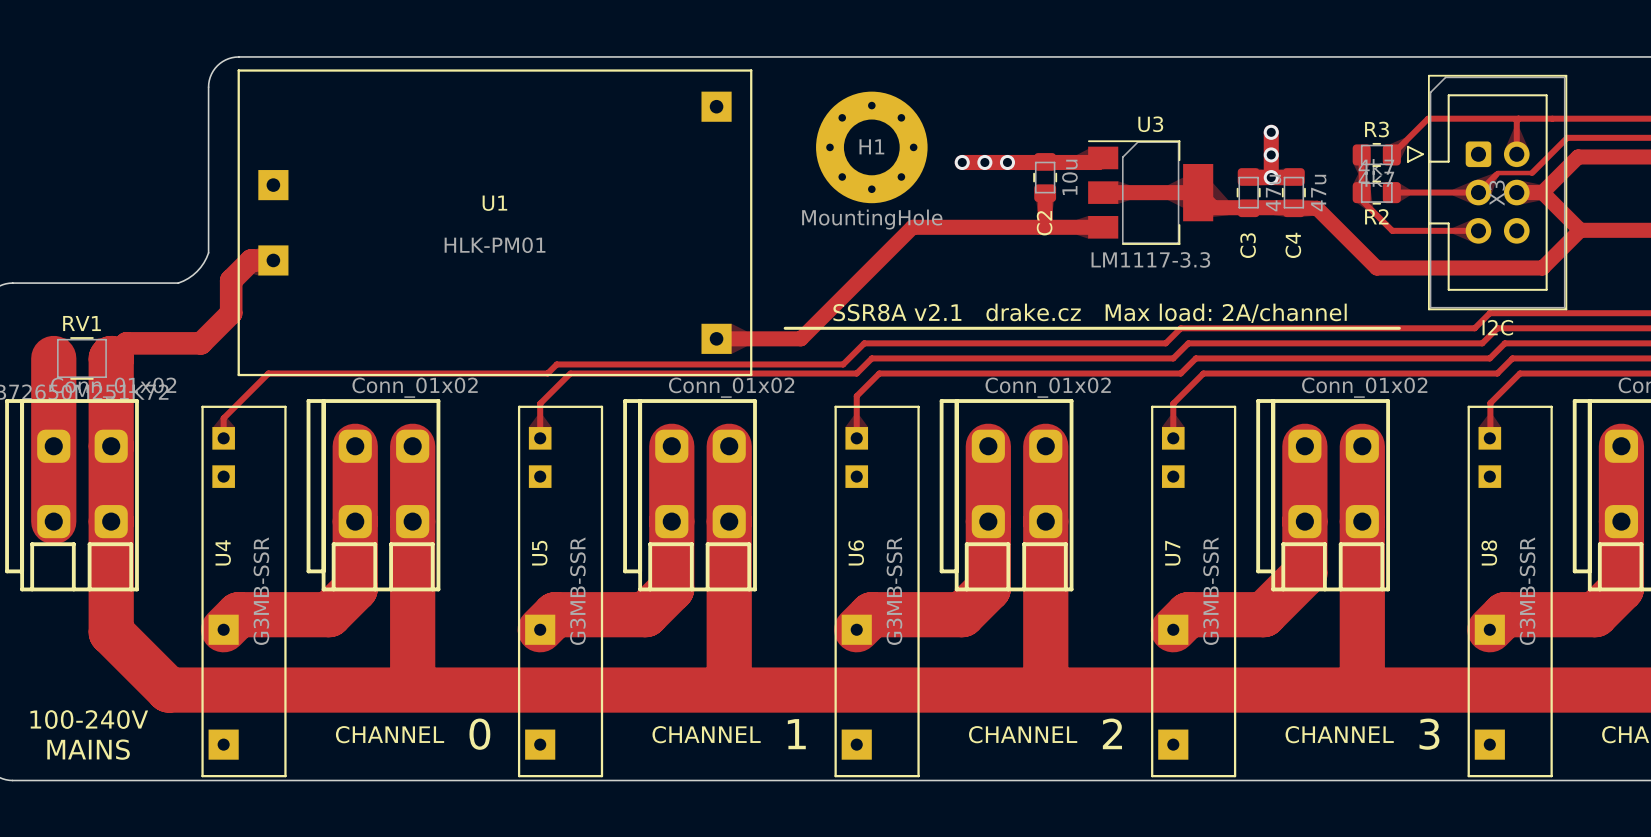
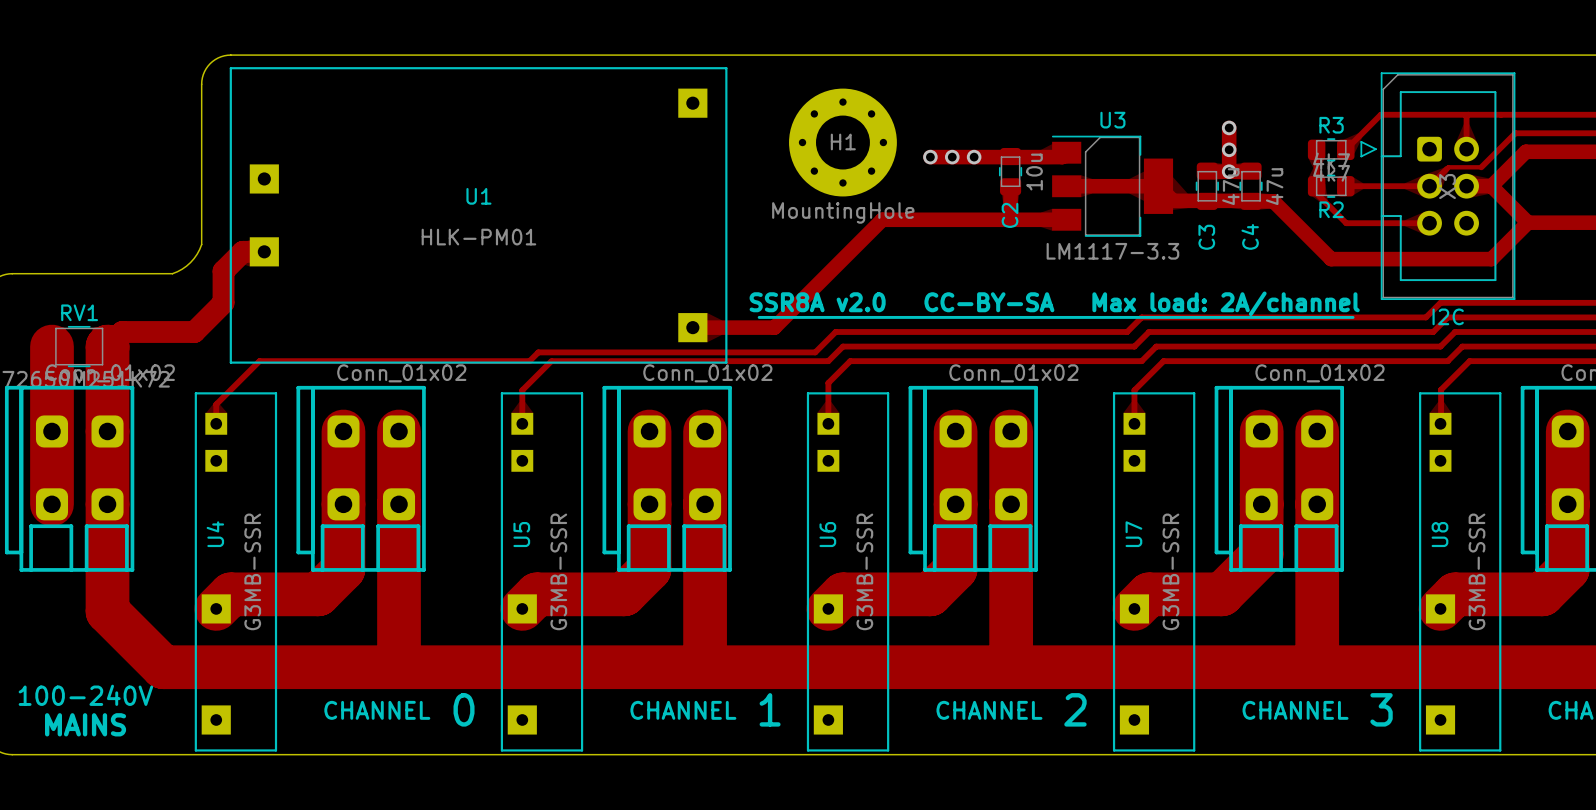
text: SSR8A v2.1 drake.cz Max load: 2A/channel (1090, 313) -> SSR8A v2.0 CC-BY-SA Max load: 2A/channel (1054, 303)

